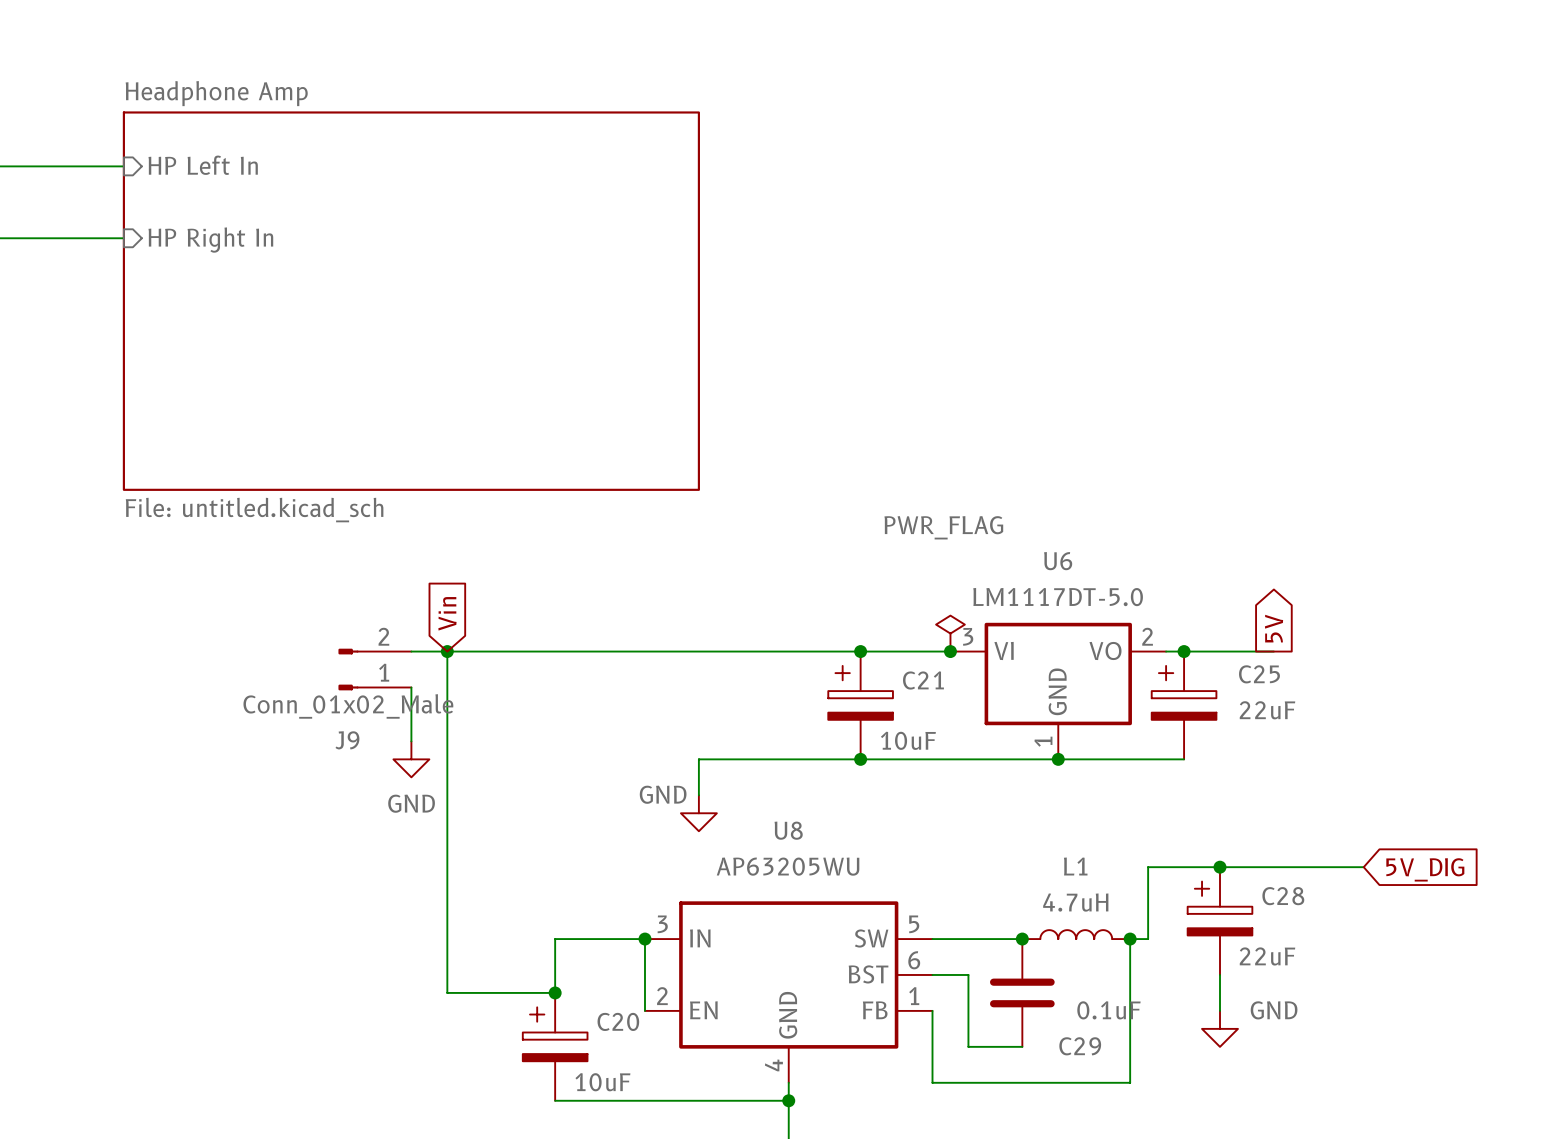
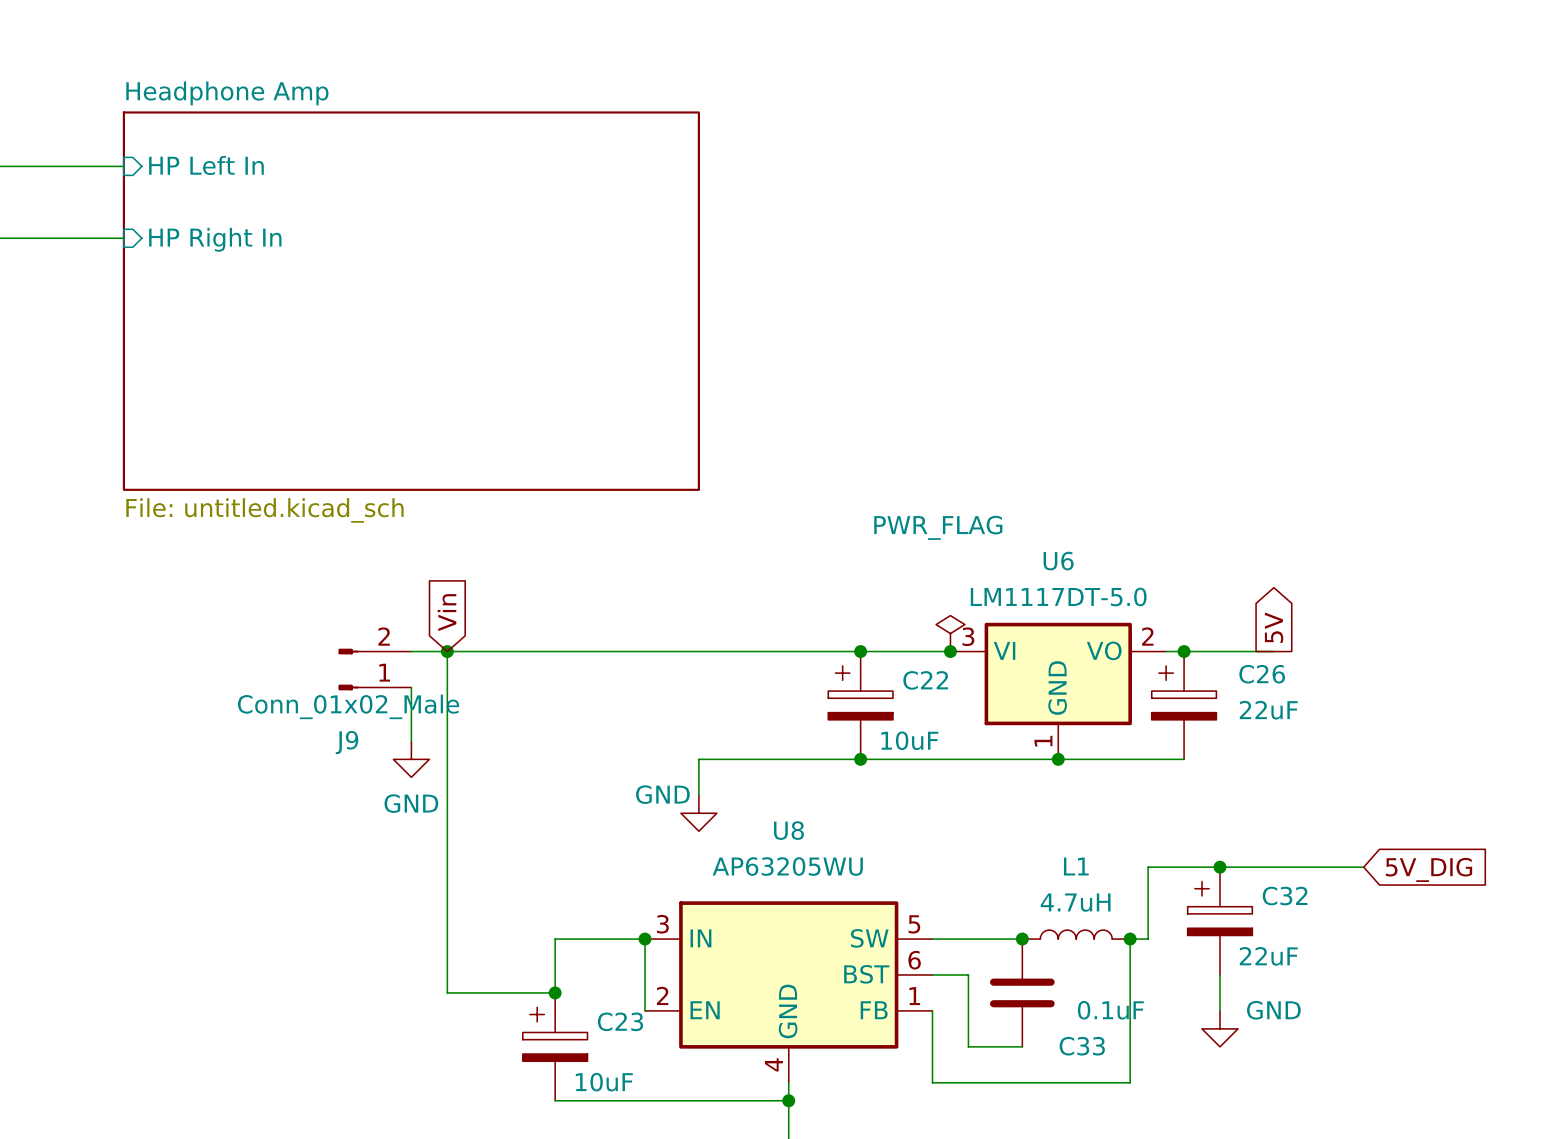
C25 name: C25 (1259, 674) -> C26 (1262, 674)
C21 name: C21 (923, 680) -> C22 (925, 680)
C28 name: C28 (1283, 896) -> C32 (1285, 896)
C20 name: C20 (618, 1021) -> C23 (620, 1021)
C29 name: C29 (1080, 1046) -> C33 (1082, 1046)

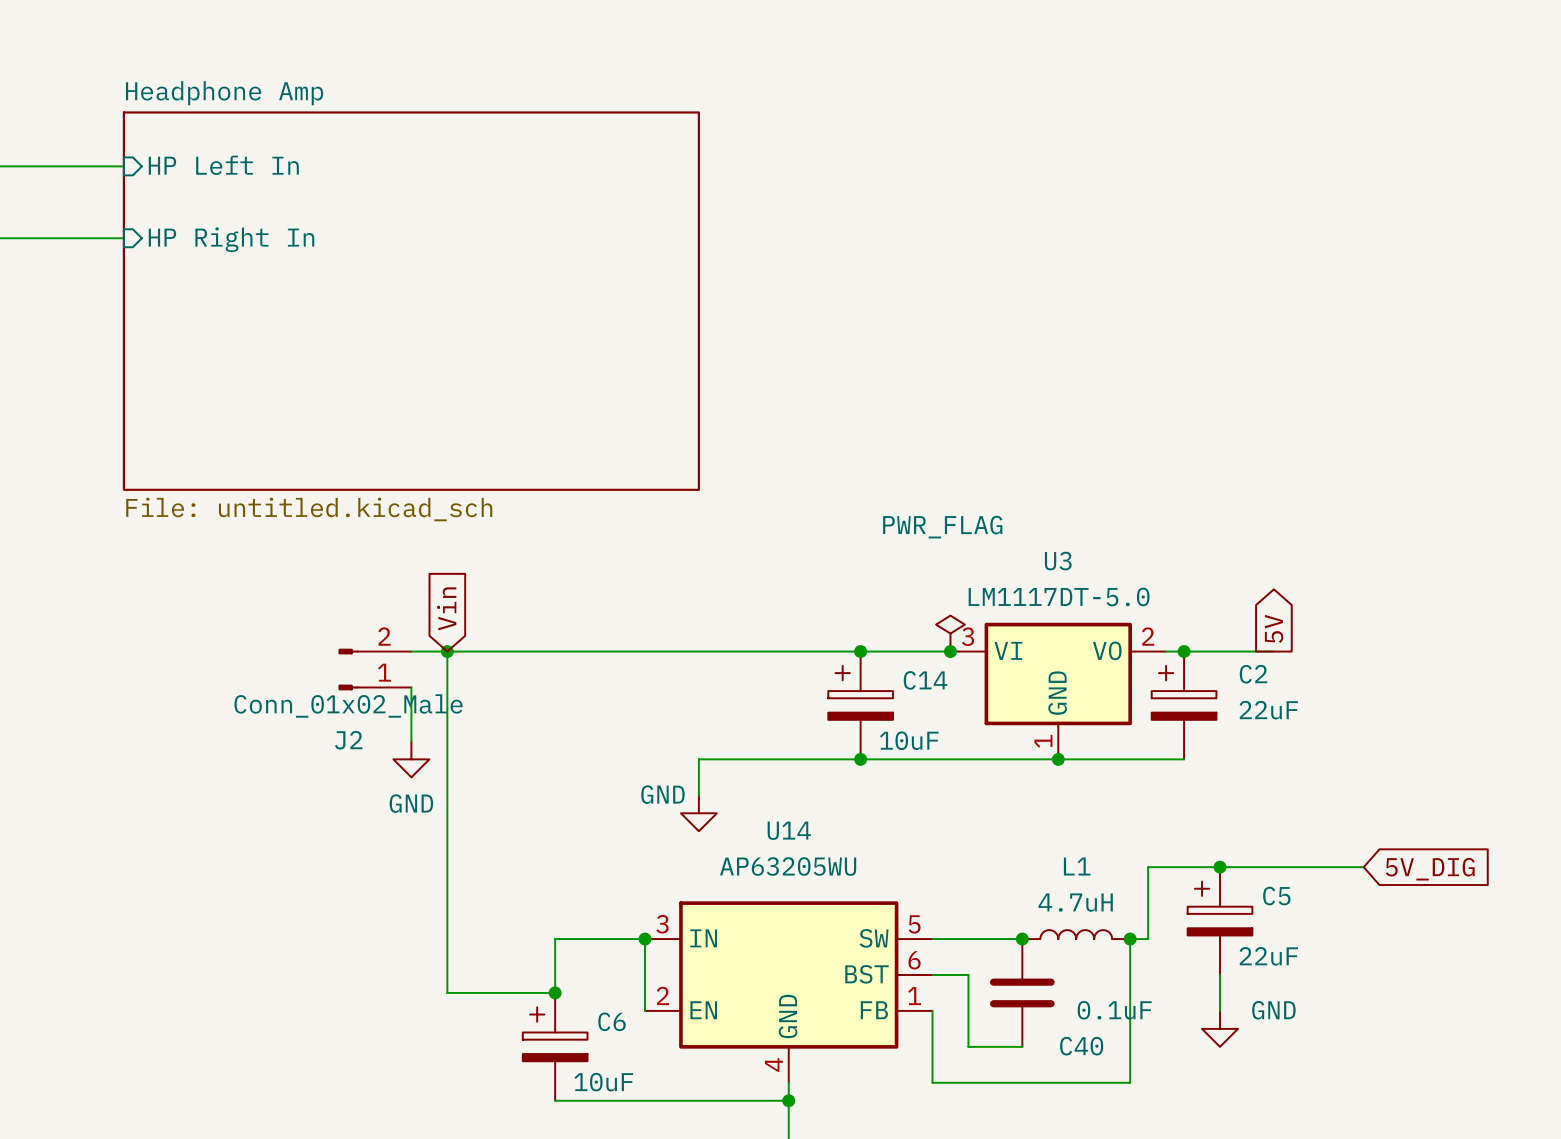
U6 name: U6 (1058, 561) -> U3 (1058, 561)
C26 name: C26 (1262, 674) -> C2 (1253, 674)
C22 name: C22 (925, 680) -> C14 (925, 680)
J9 name: J9 (347, 742) -> J2 (348, 740)
U8 name: U8 (788, 830) -> U14 (789, 830)
C32 name: C32 (1285, 896) -> C5 (1276, 896)
C23 name: C23 (620, 1021) -> C6 (612, 1021)
C33 name: C33 (1082, 1046) -> C40 (1081, 1046)

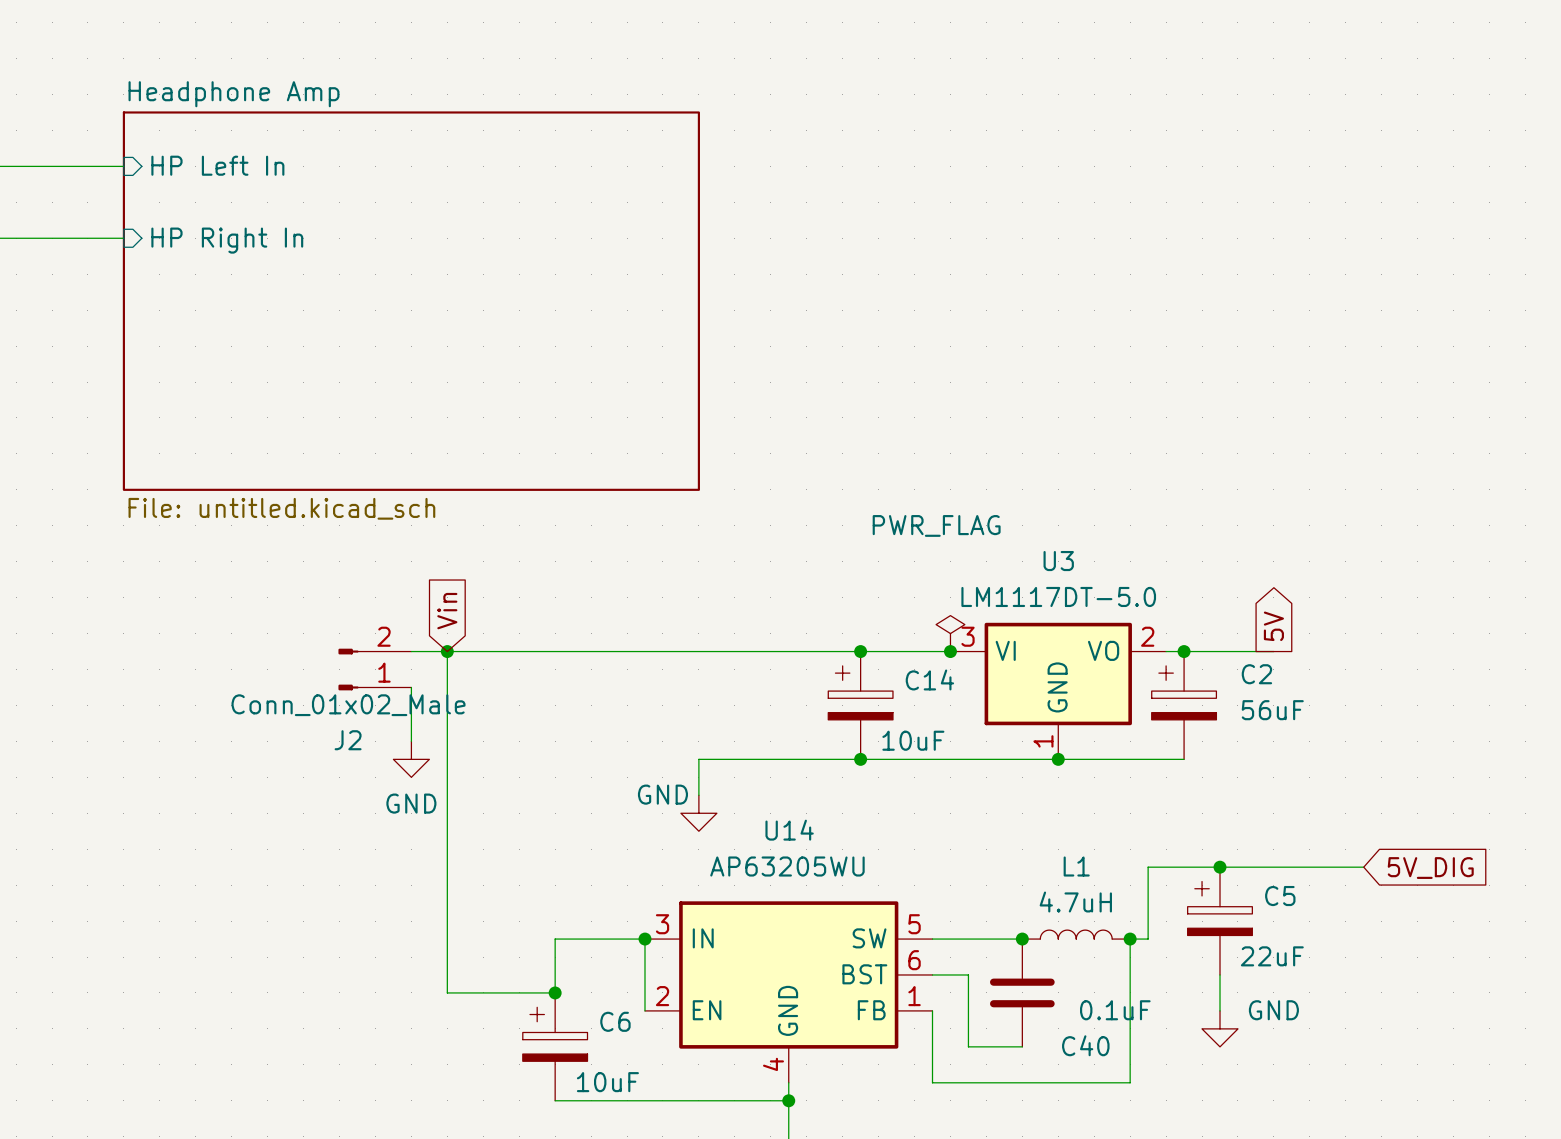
C2 value: 22uF (1268, 710) -> 56uF (1272, 710)

